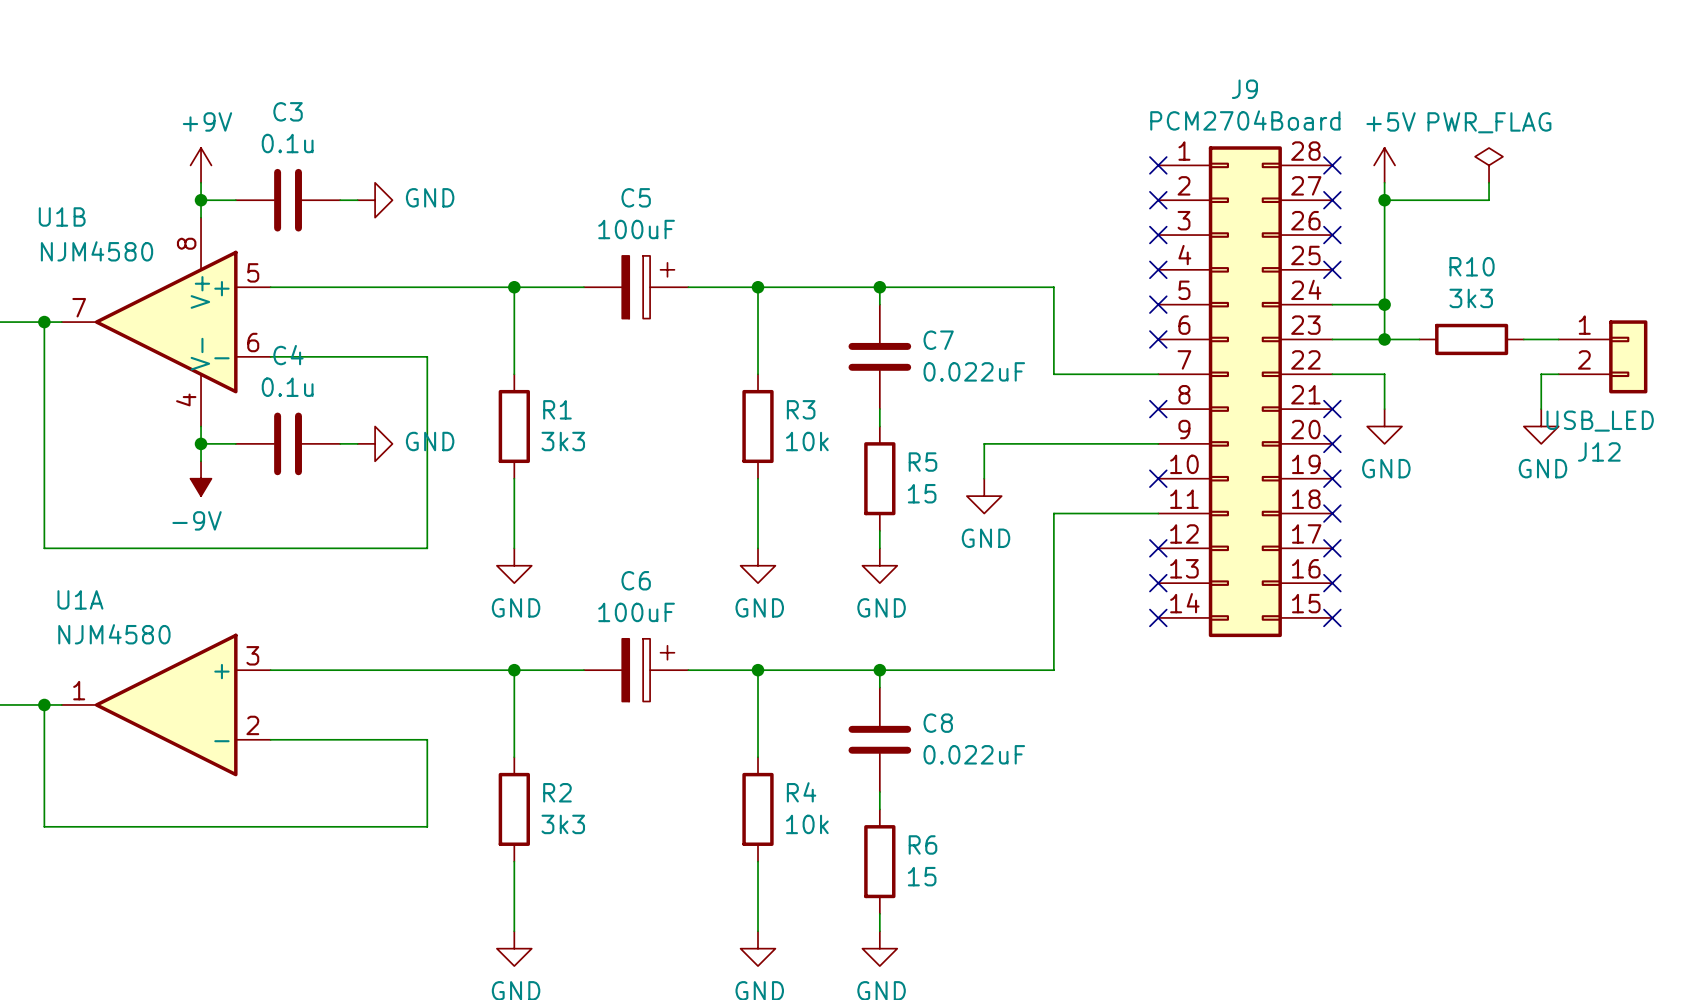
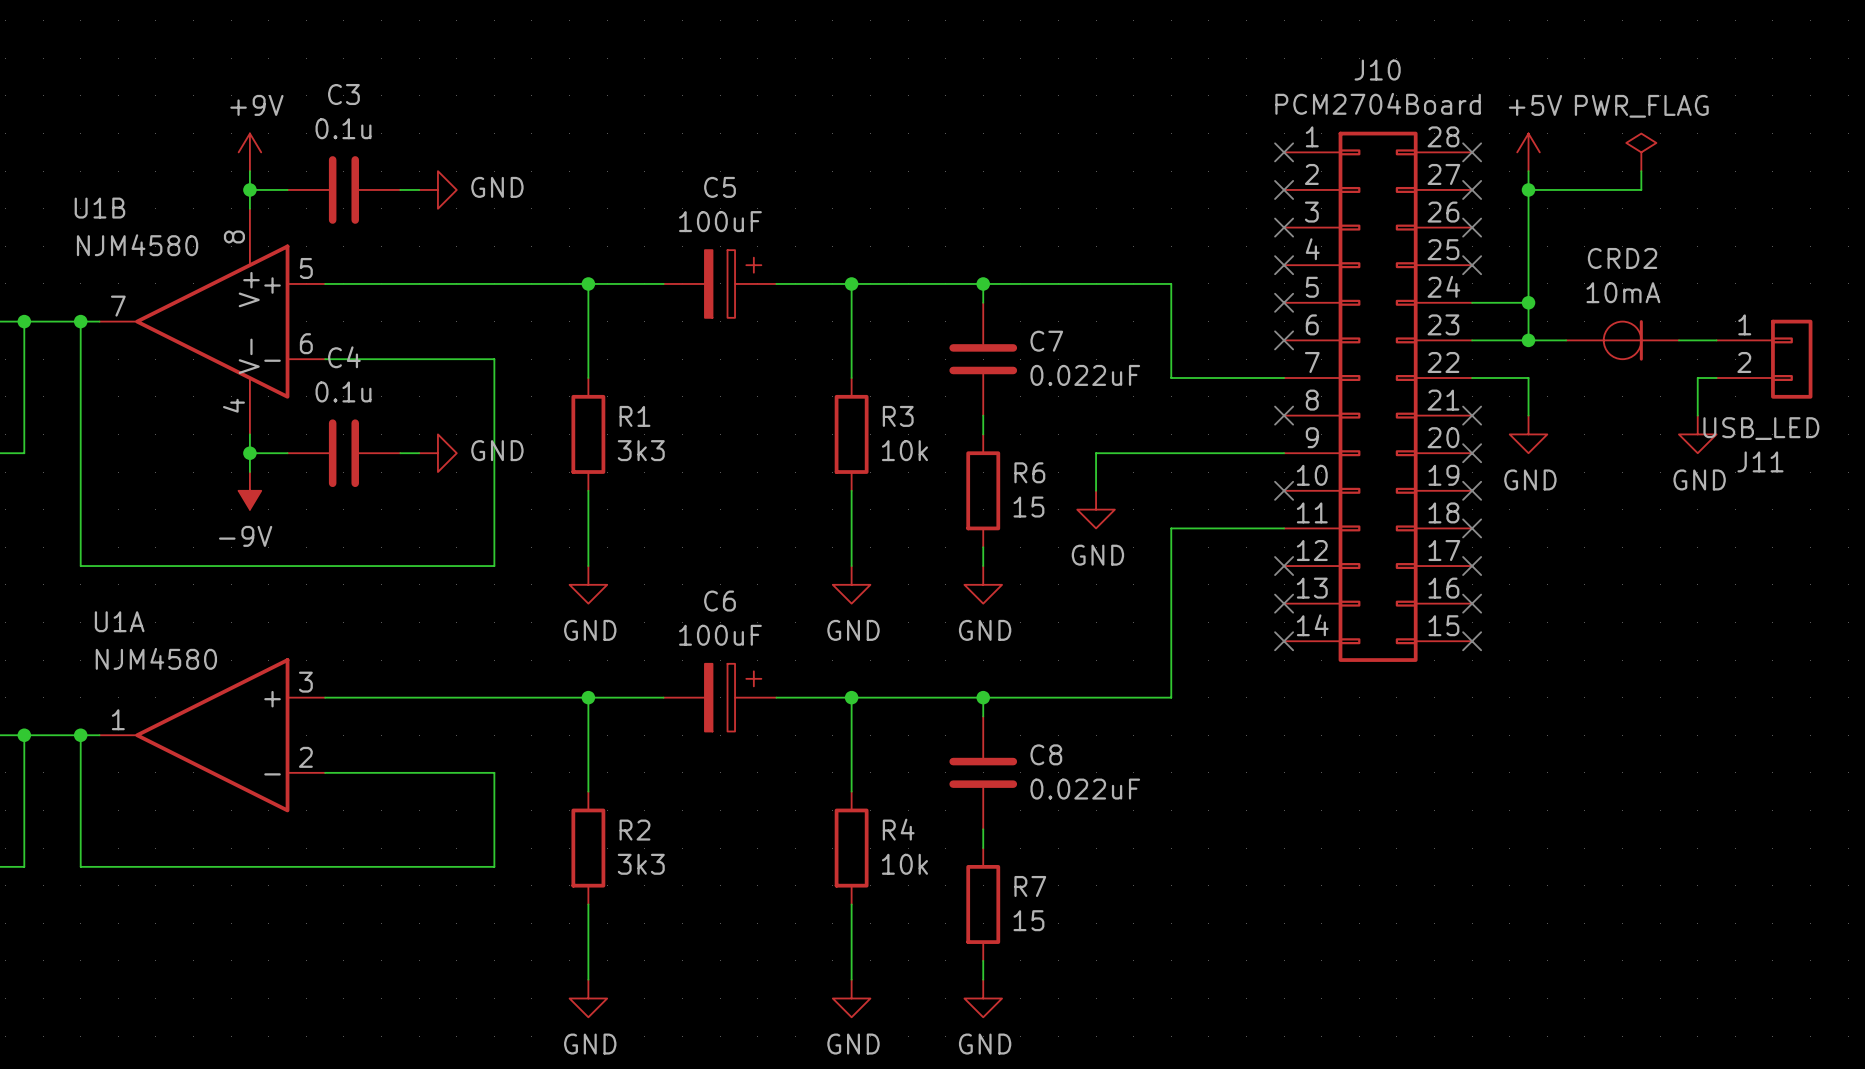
J9 name: J9 (1244, 89) -> J10 (1377, 70)
R10: 3k3 (1471, 339) -> none
CRD2: none -> 10mA (1622, 340)
J12 name: J12 (1599, 451) -> J11 (1760, 461)
R5 name: R5 (922, 462) -> R6 (1029, 472)
R6 name: R6 (922, 844) -> R7 (1030, 886)

